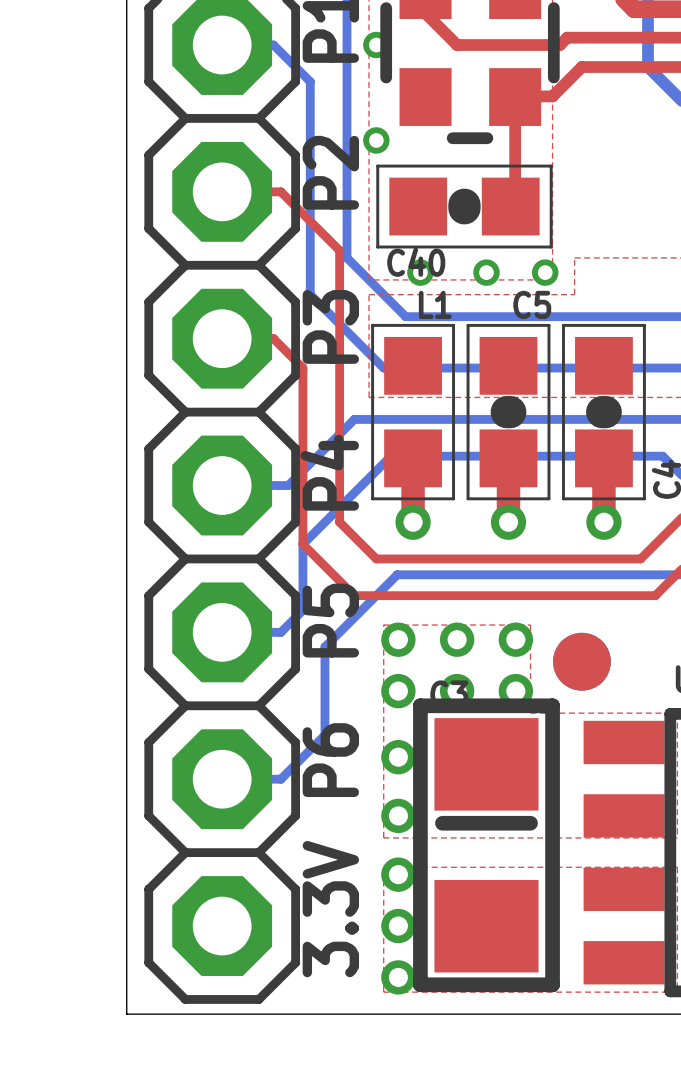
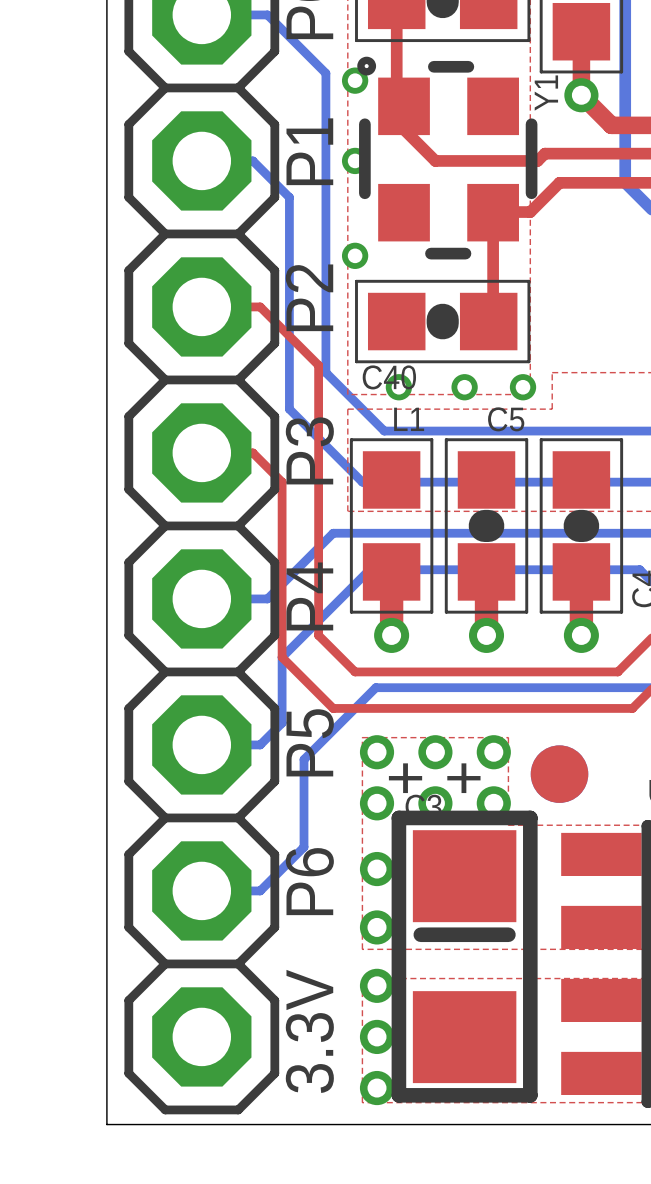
text: none -> + (405, 778)
text: none -> + (463, 778)

